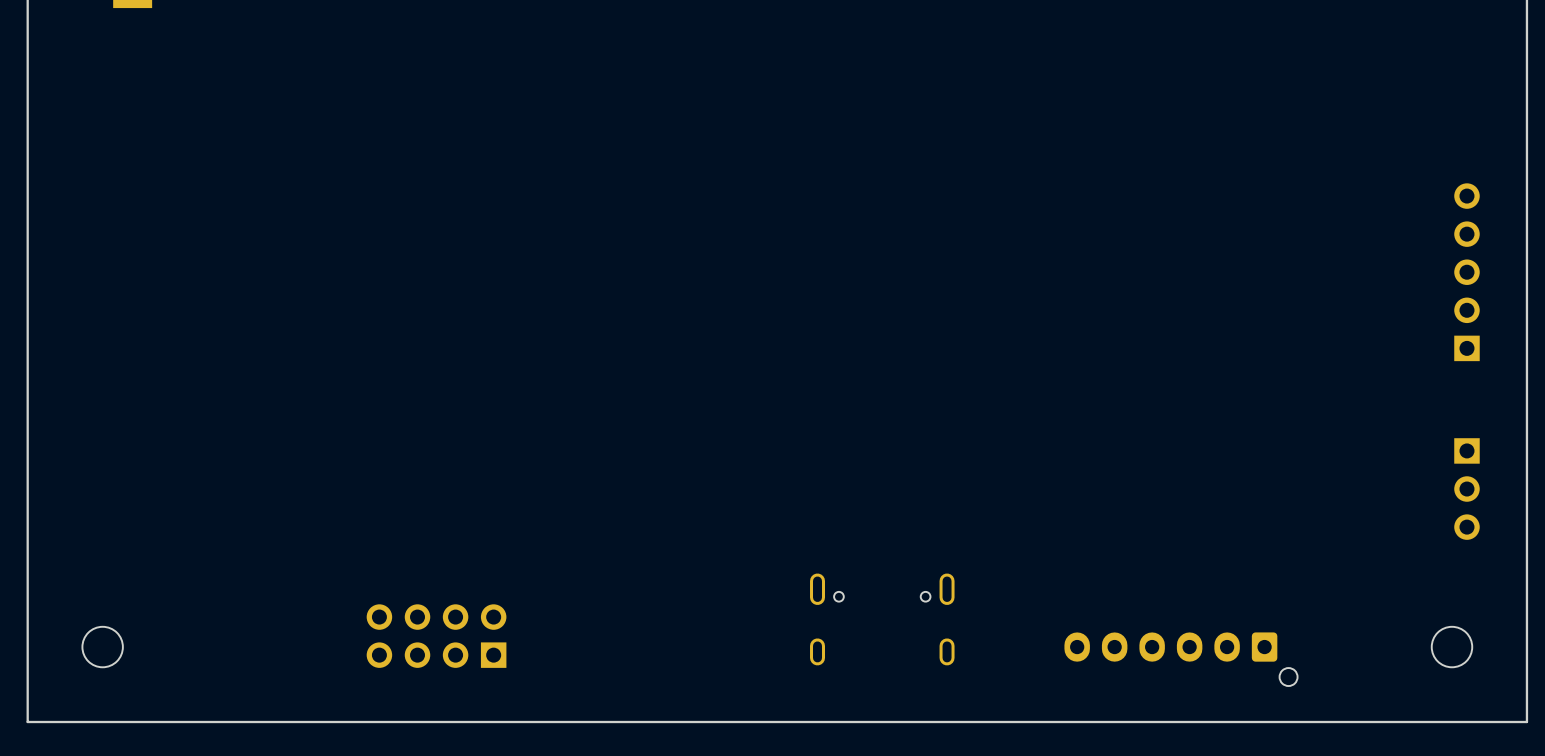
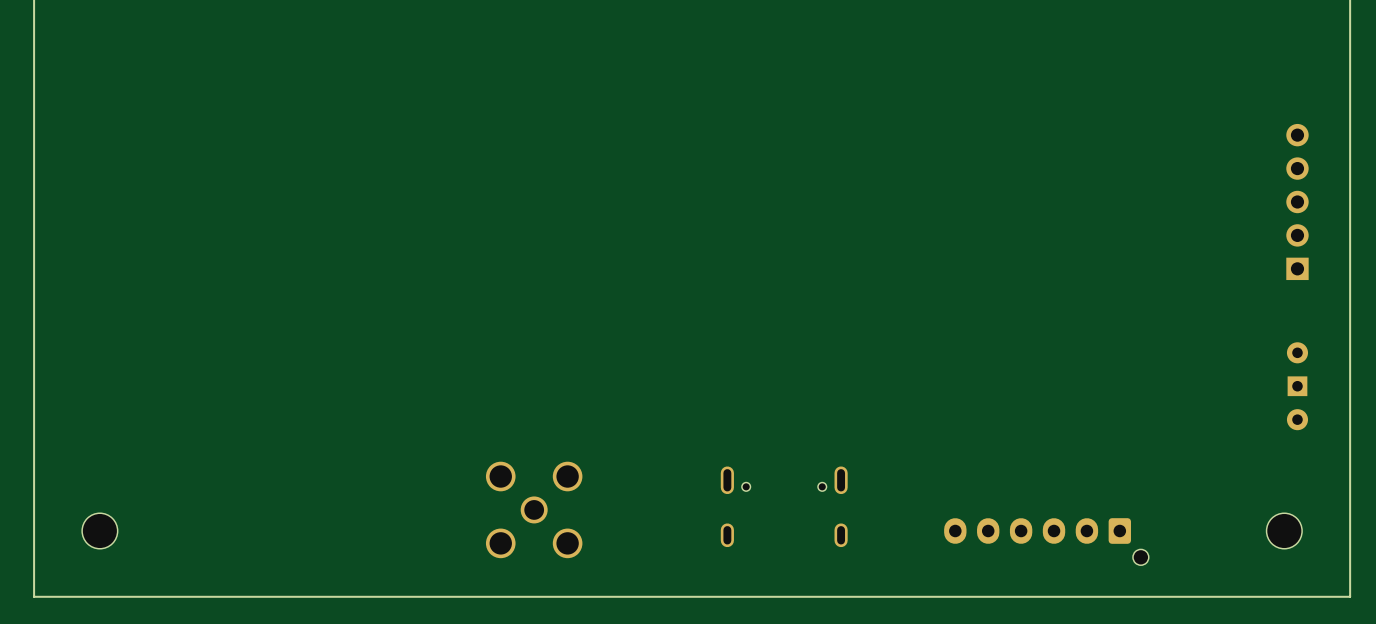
part footprint: [1454, 438, 1480, 540] -> [1286, 342, 1309, 431]
part: none -> (534, 509)
part: (436, 636) -> none

